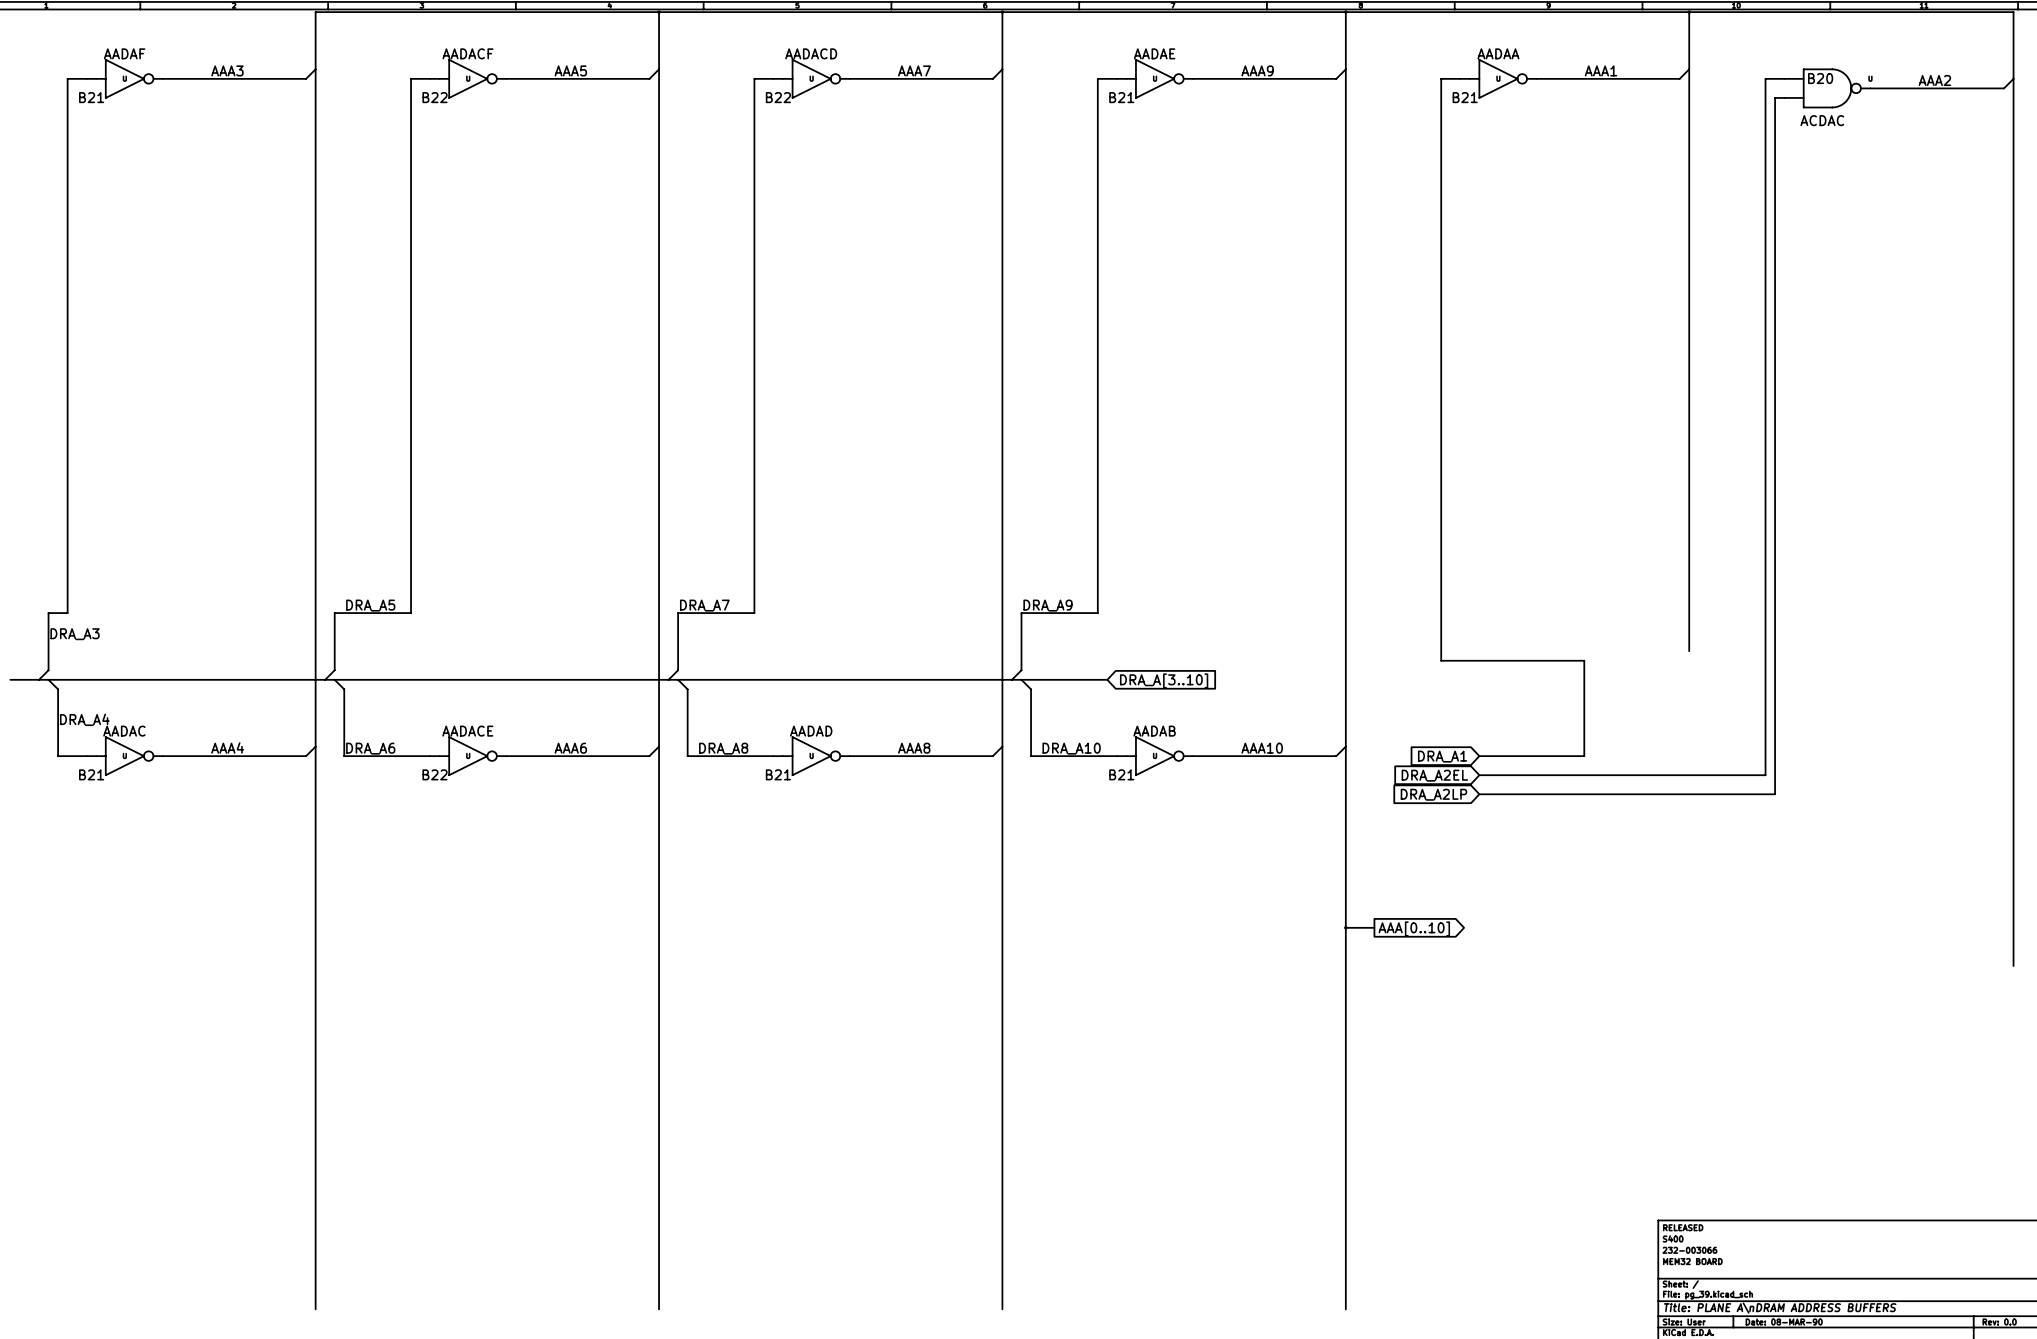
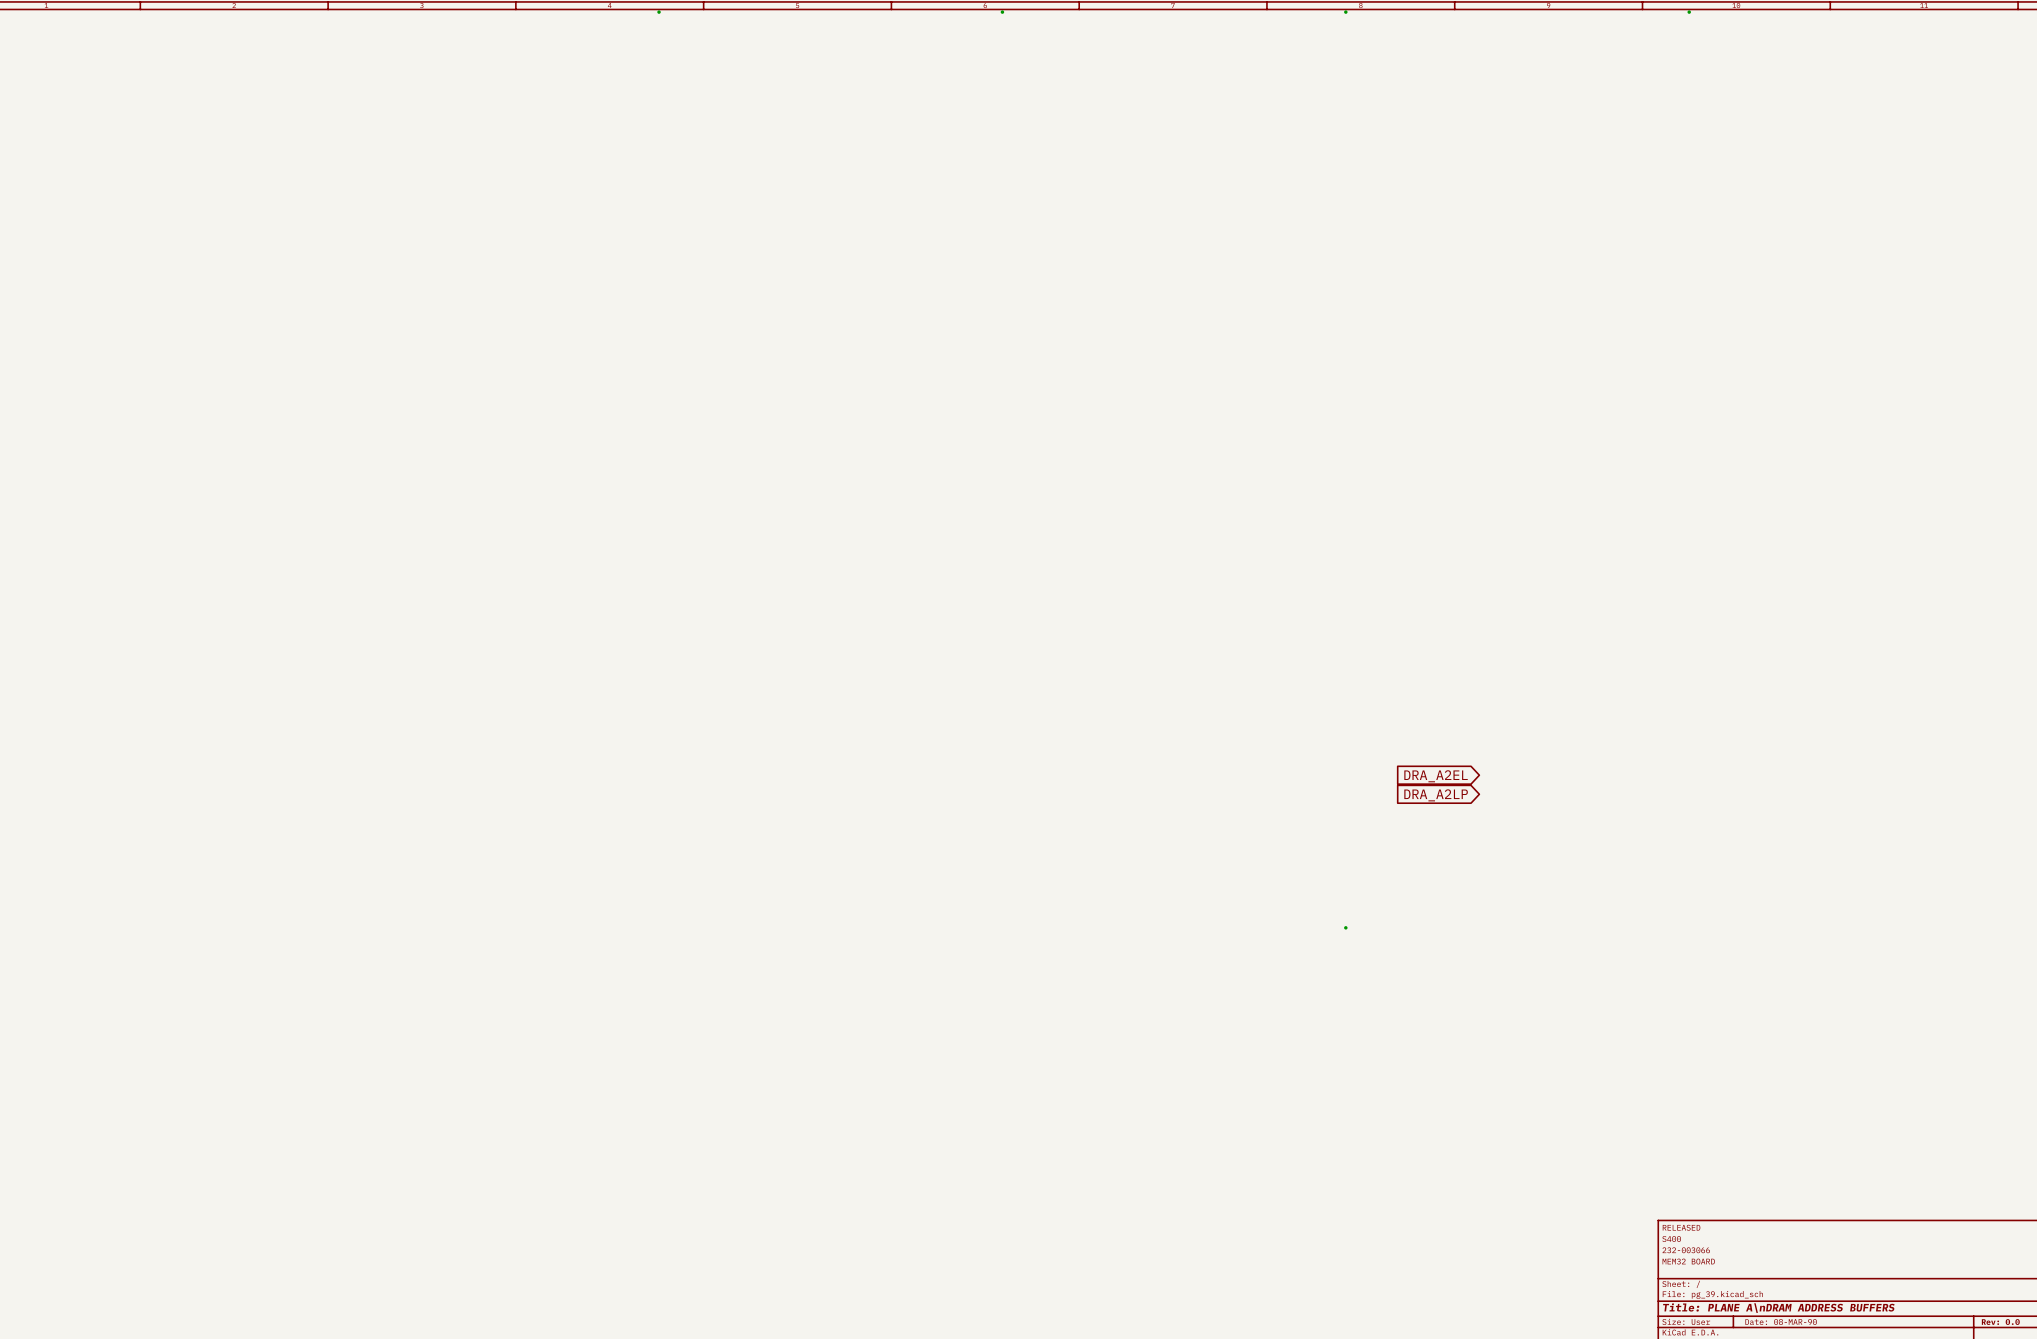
bus: (659, 12) (659, 1309) -> none
bus: (1002, 12) (1002, 1309) -> none
bus: (1345, 12) (1345, 1309) -> none
bus: (1689, 12) (1689, 651) -> none
wire: (315, 69) (306, 78) (163, 78) -> none
wire: (659, 69) (649, 78) (506, 78) -> none
wire: (1002, 69) (992, 78) (849, 78) -> none
wire: (1345, 69) (1336, 78) (1193, 78) -> none
wire: (1689, 69) (1679, 78) (1536, 78) -> none
label: AAA3 (227, 70) -> none
label: AAA5 (570, 70) -> none
label: AAA7 (914, 70) -> none
label: AAA9 (1257, 70) -> none
label: AAA1 (1601, 70) -> none
wire: (86, 78) (67, 78) (67, 613) (48, 613) (48, 670) (39, 679) -> none
part: (124, 78) -> none
wire: (430, 78) (411, 78) (411, 613) (334, 613) (334, 670) (325, 679) -> none
part: (468, 78) -> none
wire: (773, 78) (754, 78) (754, 613) (678, 613) (678, 670) (668, 679) -> none
part: (811, 78) -> none
wire: (1116, 78) (1097, 78) (1097, 613) (1021, 613) (1021, 670) (1011, 679) -> none
part: (1155, 78) -> none
wire: (1460, 78) (1441, 78) (1441, 660) (1584, 660) (1584, 756) (1479, 756) -> none
part: (1498, 78) -> none
wire: (1784, 78) (1765, 78) (1765, 775) (1479, 775) -> none
wire: (2013, 78) (2004, 88) (1870, 88) -> none
label: AAA2 (1934, 80) -> none
part: (1827, 88) -> none
wire: (1784, 97) (1775, 97) (1775, 794) (1479, 794) -> none
label: DRA_A5 (370, 605) -> none
label: DRA_A7 (704, 605) -> none
label: DRA_A9 (1048, 605) -> none
label: DRA_A3 (75, 634) -> none
bus: (10, 679) (1107, 679) -> none
wire: (48, 679) (58, 689) (58, 756) (86, 756) -> none
wire: (334, 679) (344, 689) (344, 756) (430, 756) -> none
wire: (678, 679) (687, 689) (687, 756) (773, 756) -> none
wire: (1021, 679) (1031, 689) (1031, 756) (1116, 756) -> none
global label: DRA_A[3..10] (1164, 680) -> none
label: DRA_A4 (84, 719) -> none
wire: (315, 746) (306, 756) (163, 756) -> none
wire: (659, 746) (649, 756) (506, 756) -> none
wire: (1002, 746) (992, 756) (849, 756) -> none
wire: (1345, 746) (1336, 756) (1193, 756) -> none
label: AAA4 (227, 747) -> none
label: DRA_A6 (370, 748) -> none
label: AAA6 (570, 748) -> none
label: DRA_A8 (723, 748) -> none
label: AAA8 (914, 748) -> none
label: DRA_A10 (1071, 748) -> none
label: AAA10 (1262, 748) -> none
part: (124, 756) -> none
part: (468, 756) -> none
part: (811, 756) -> none
part: (1155, 756) -> none
global label: DRA_A1 (1442, 756) -> none
bus: (1345, 927) (1374, 927) -> none
global label: AAA[0..10] (1414, 928) -> none
bus: (2013, 965) (2013, 12) (315, 12) (315, 1309) -> none

